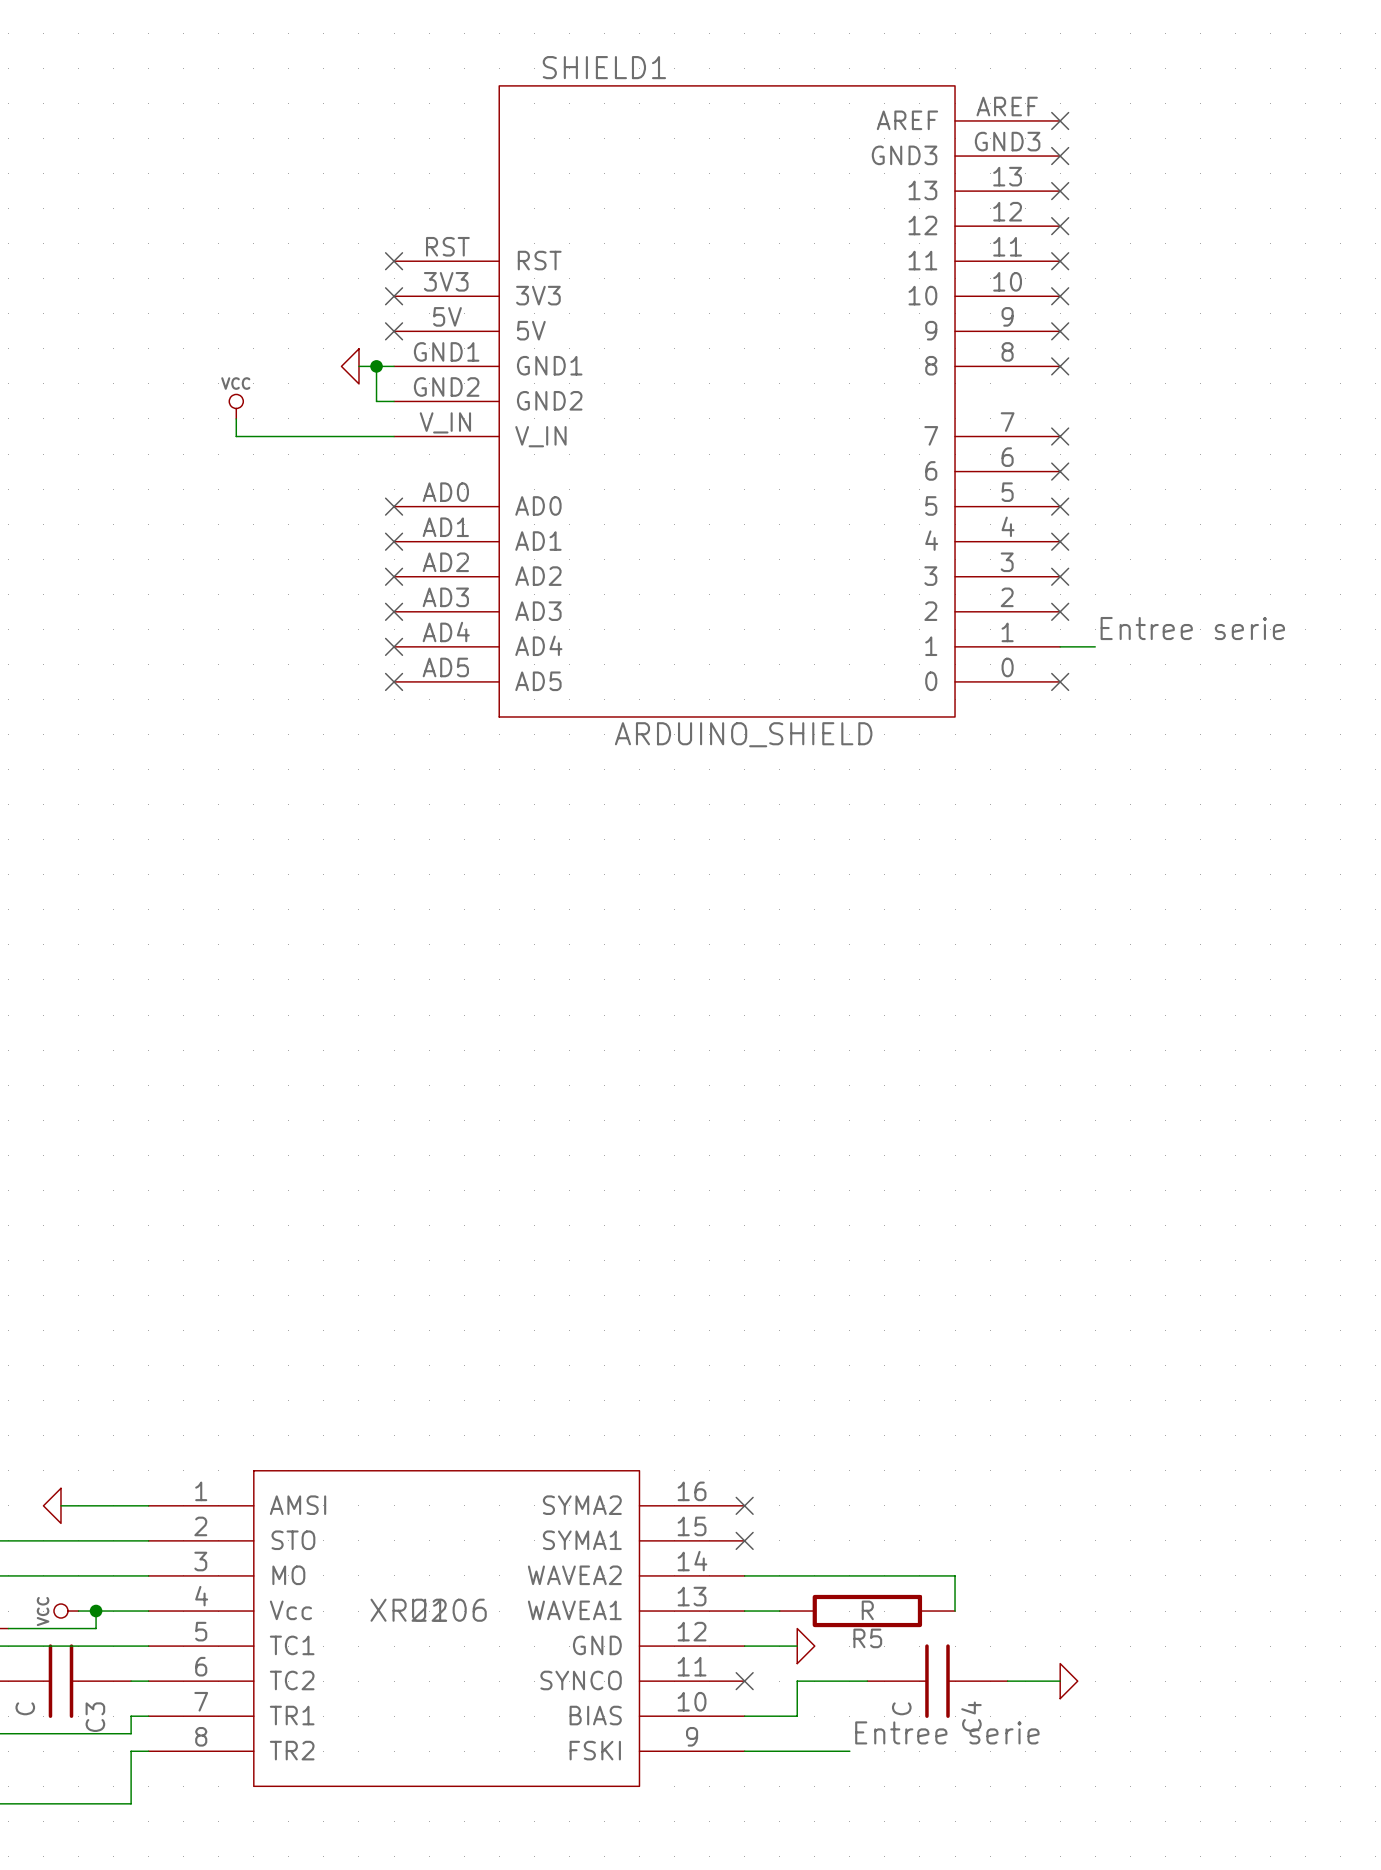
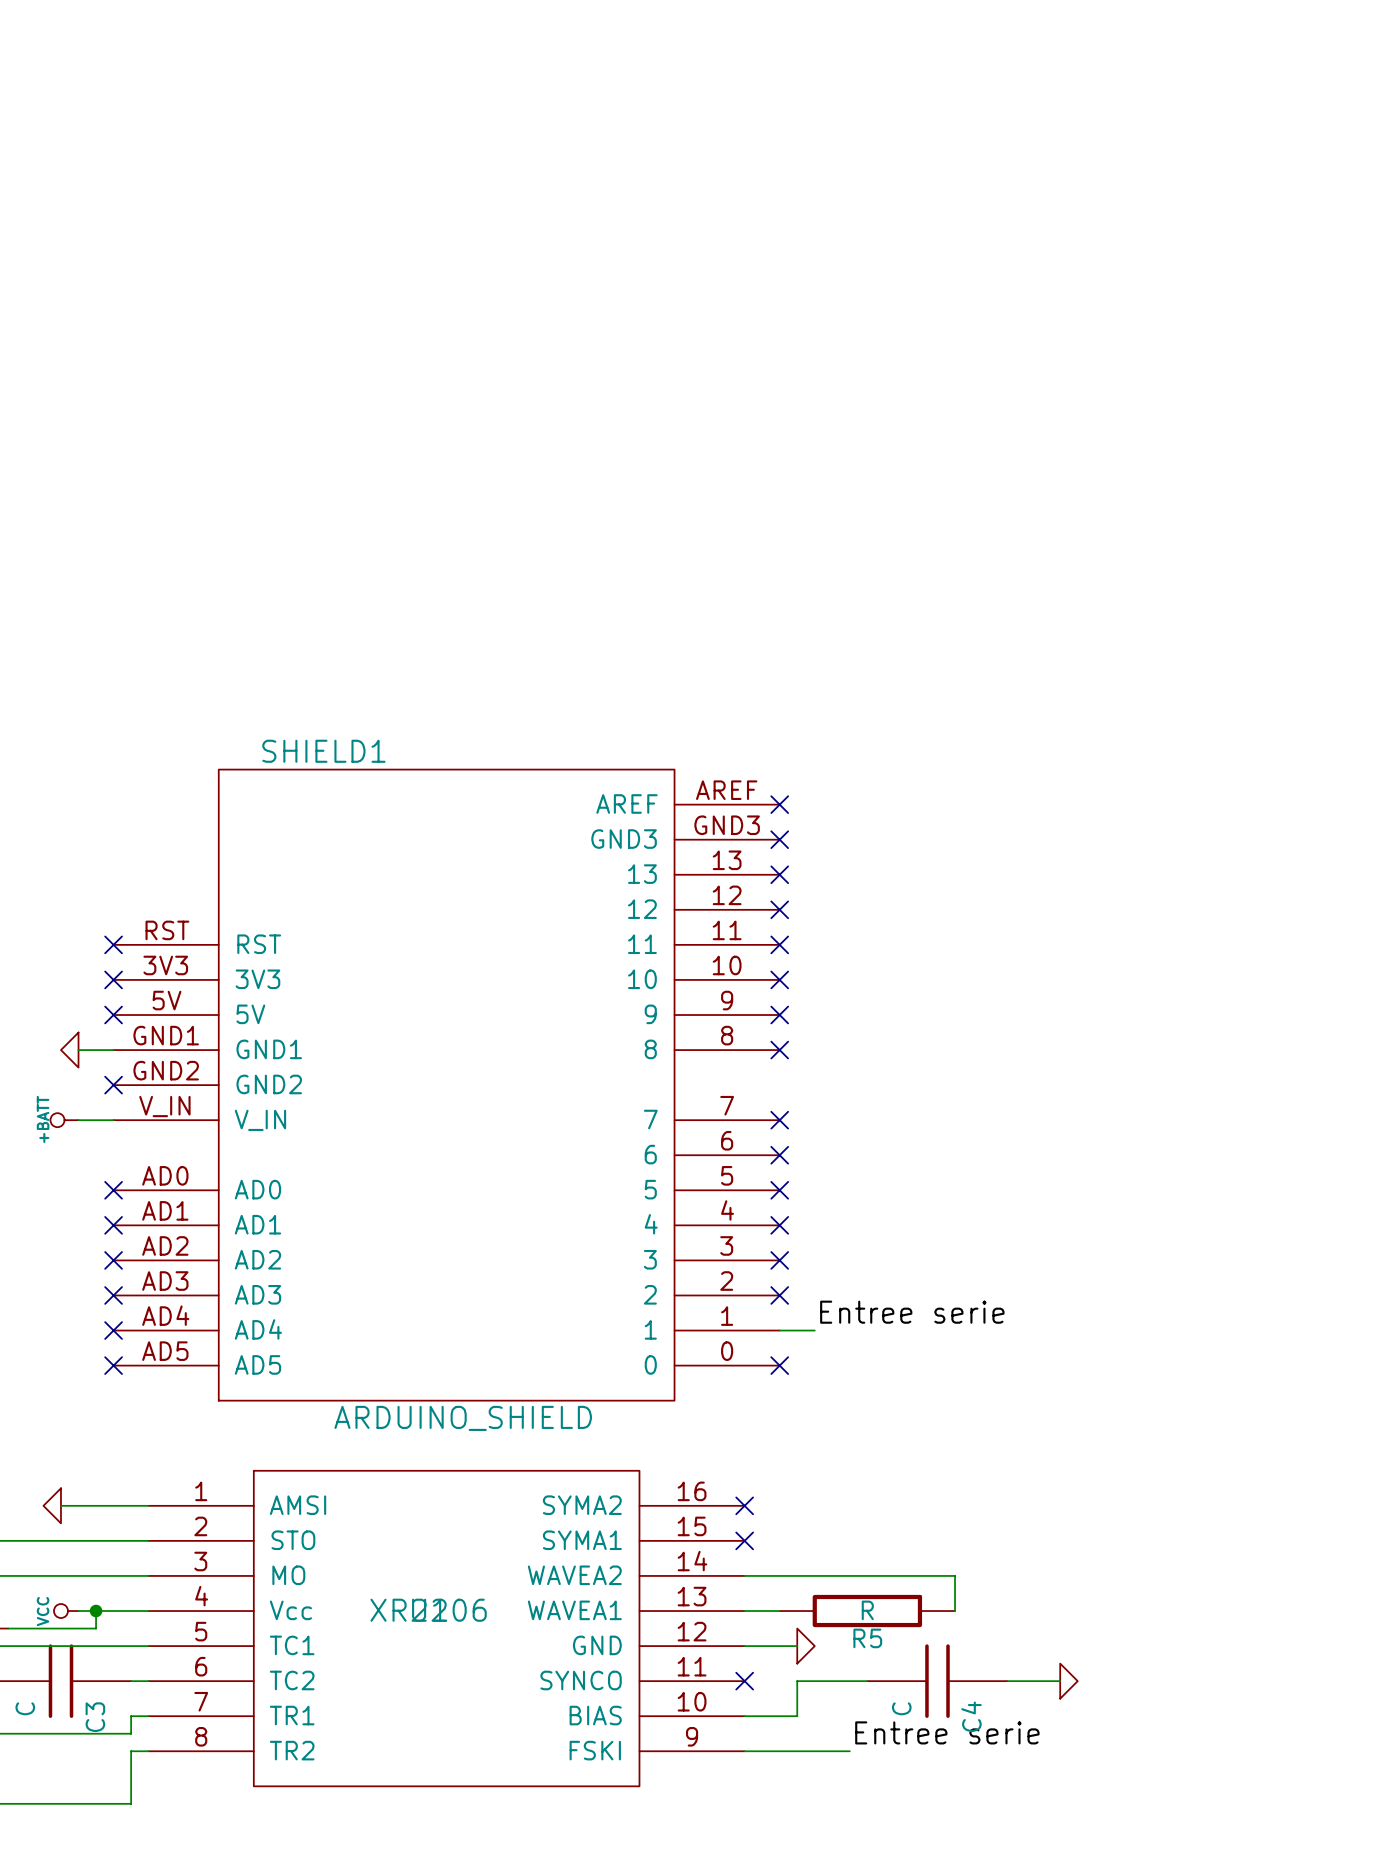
no-connect mark: (1060, 120) -> none
no-connect mark: (1060, 156) -> none
no-connect mark: (1060, 191) -> none
no-connect mark: (1060, 226) -> none
no-connect mark: (394, 261) -> none
no-connect mark: (1060, 261) -> none
no-connect mark: (394, 296) -> none
no-connect mark: (1060, 296) -> none
no-connect mark: (394, 331) -> none
no-connect mark: (1060, 331) -> none
power symbol: (350, 366) -> none
wire: (358, 366) (394, 366) -> none
wire: (376, 366) (376, 401) (394, 401) -> none
junction: (376, 366) -> none
no-connect mark: (1060, 366) -> none
SHIELD1 position: (727, 401) -> (446, 1085)
power symbol: VCC (236, 406) -> none
wire: (236, 418) (236, 436) (394, 436) -> none
no-connect mark: (1060, 436) -> none
no-connect mark: (1060, 471) -> none
no-connect mark: (394, 506) -> none
no-connect mark: (1060, 506) -> none
no-connect mark: (394, 541) -> none
no-connect mark: (1060, 541) -> none
no-connect mark: (394, 576) -> none
no-connect mark: (1060, 576) -> none
no-connect mark: (394, 611) -> none
no-connect mark: (1060, 611) -> none
label: Entree serie (1192, 628) -> none
no-connect mark: (394, 646) -> none
wire: (1060, 646) (1095, 646) -> none
no-connect mark: (394, 681) -> none
no-connect mark: (1060, 681) -> none
no-connect mark: none -> (779, 804)
no-connect mark: none -> (779, 839)
no-connect mark: none -> (779, 874)
no-connect mark: none -> (779, 909)
no-connect mark: none -> (113, 944)
no-connect mark: none -> (779, 944)
no-connect mark: none -> (113, 979)
no-connect mark: none -> (779, 979)
no-connect mark: none -> (113, 1015)
no-connect mark: none -> (779, 1015)
power symbol: none -> (69, 1050)
wire: none -> (78, 1050) (113, 1050)
no-connect mark: none -> (779, 1050)
no-connect mark: none -> (113, 1085)
power symbol: none -> +BATT (64, 1120)
wire: none -> (78, 1120) (113, 1120)
no-connect mark: none -> (779, 1120)
no-connect mark: none -> (779, 1155)
no-connect mark: none -> (113, 1190)
no-connect mark: none -> (779, 1190)
no-connect mark: none -> (113, 1225)
no-connect mark: none -> (779, 1225)
no-connect mark: none -> (113, 1260)
no-connect mark: none -> (779, 1260)
no-connect mark: none -> (113, 1295)
no-connect mark: none -> (779, 1295)
label: none -> Entree serie (912, 1312)
no-connect mark: none -> (113, 1330)
wire: none -> (779, 1330) (814, 1330)
no-connect mark: none -> (113, 1365)
no-connect mark: none -> (779, 1365)

